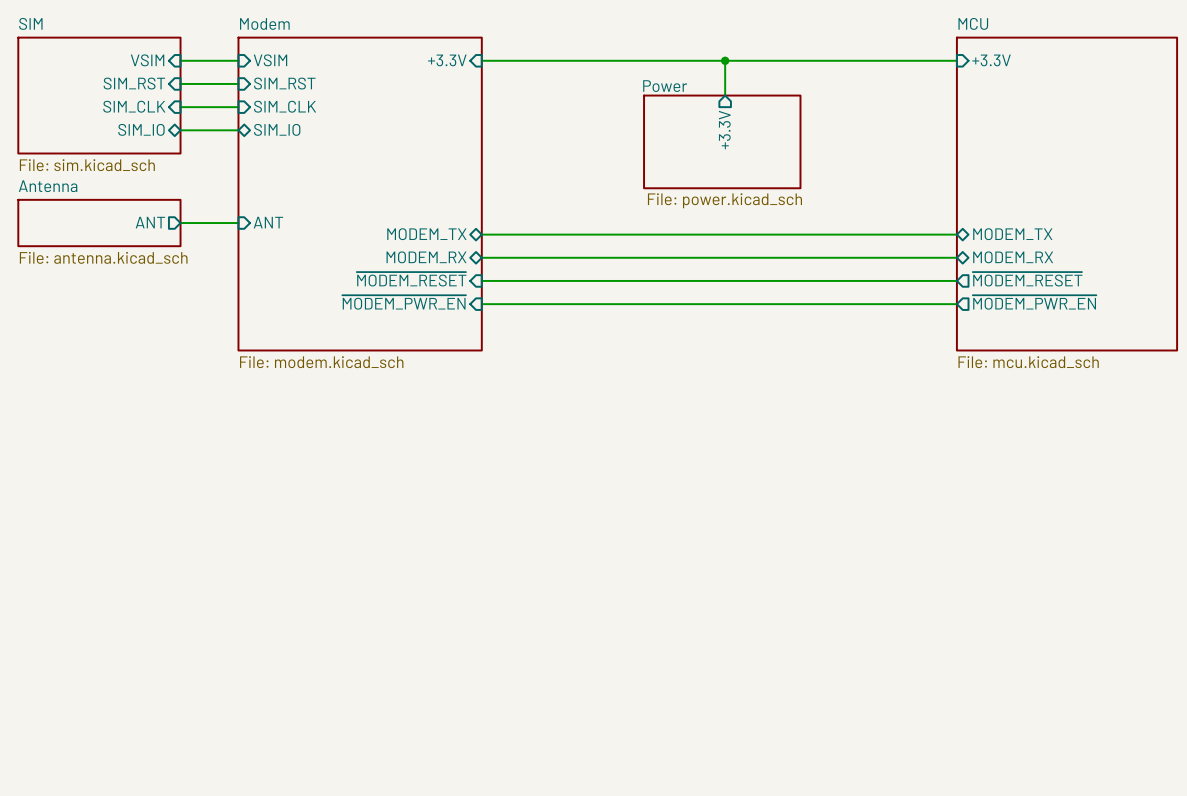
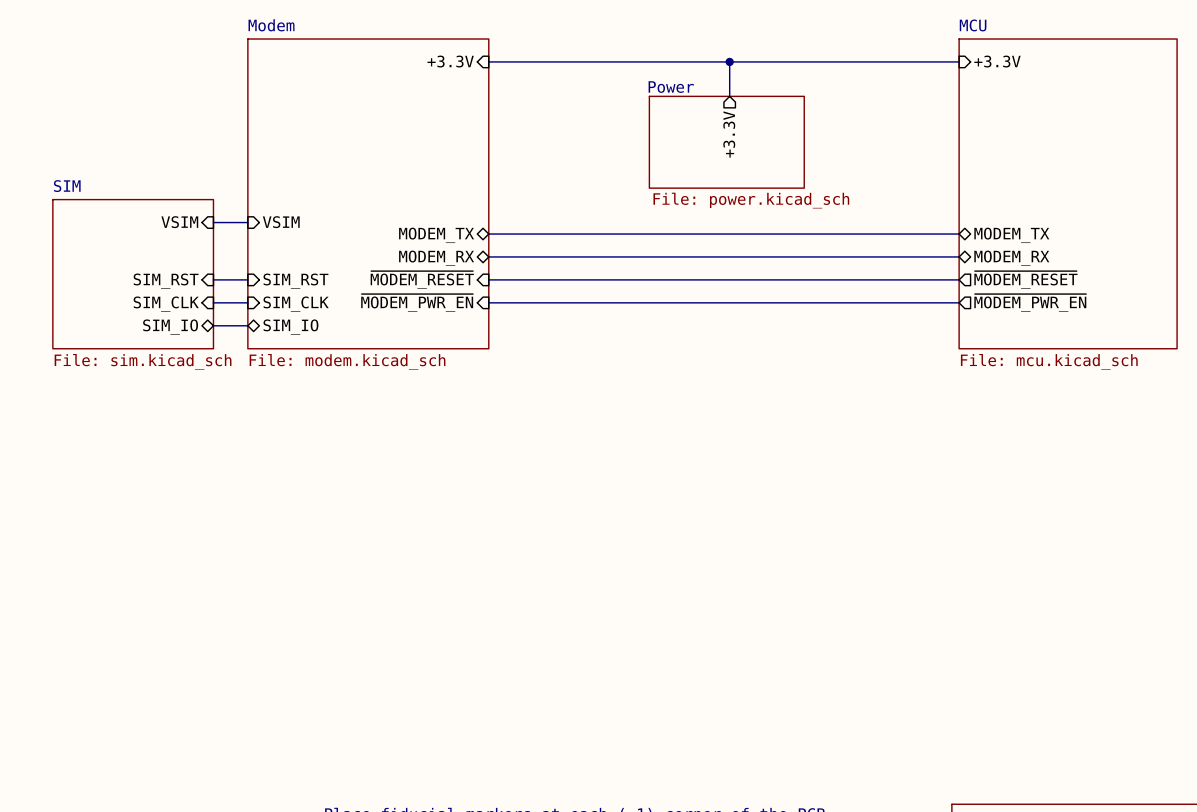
sheet pin: VSIM (147, 60) -> none
wire: (180, 60) (238, 60) -> none
sheet pin: VSIM (270, 60) -> none
sheet pin: SIM_RST (134, 83) -> none
wire: (180, 83) (238, 83) -> none
sheet pin: SIM_RST (284, 83) -> none
sheet SIM: File: sim.kicad_sch (99, 95) -> none
sheet pin: SIM_CLK (134, 106) -> none
sheet pin: SIM_CLK (285, 106) -> none
wire: (180, 107) (238, 107) -> none
sheet pin: SIM_IO (141, 129) -> none
sheet pin: SIM_IO (277, 129) -> none
wire: (180, 130) (238, 130) -> none
sheet pin: ANT (150, 222) -> none
sheet pin: none -> VSIM (179, 222)
sheet pin: ANT (268, 222) -> VSIM (281, 222)
sheet Antenna: File: antenna.kicad_sch (99, 223) -> none
wire: (180, 223) (203, 223) -> none
sheet SIM: none -> File: sim.kicad_sch (133, 274)
sheet pin: none -> SIM_RST (166, 281)
wire: none -> (213, 279) (247, 279)
sheet pin: none -> SIM_RST (295, 281)
sheet pin: none -> SIM_CLK (166, 304)
sheet pin: none -> SIM_CLK (296, 304)
wire: none -> (213, 302) (247, 302)
sheet pin: none -> SIM_IO (170, 327)
sheet pin: none -> SIM_IO (290, 327)
wire: none -> (213, 325) (247, 325)

